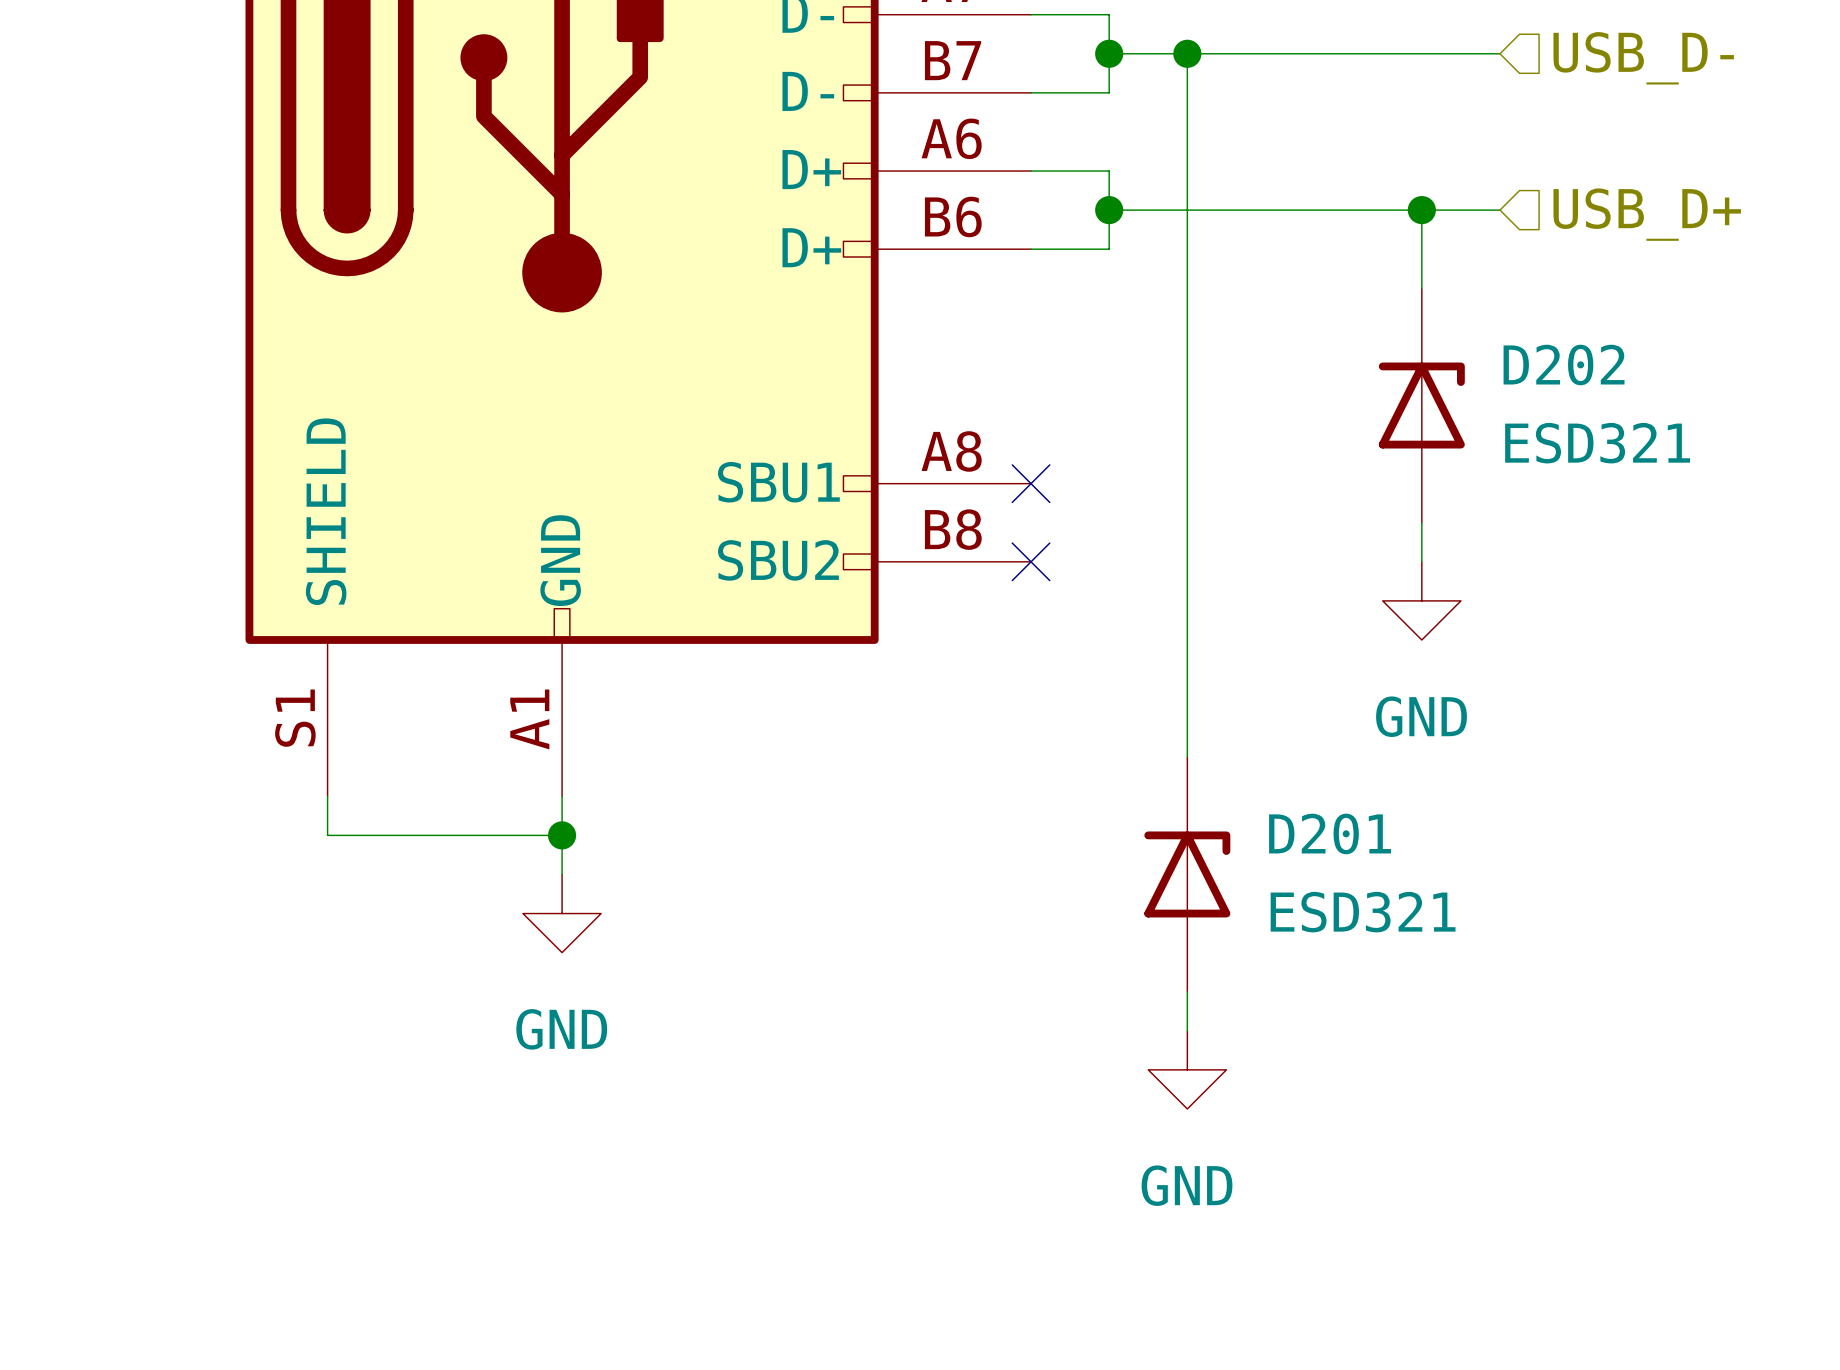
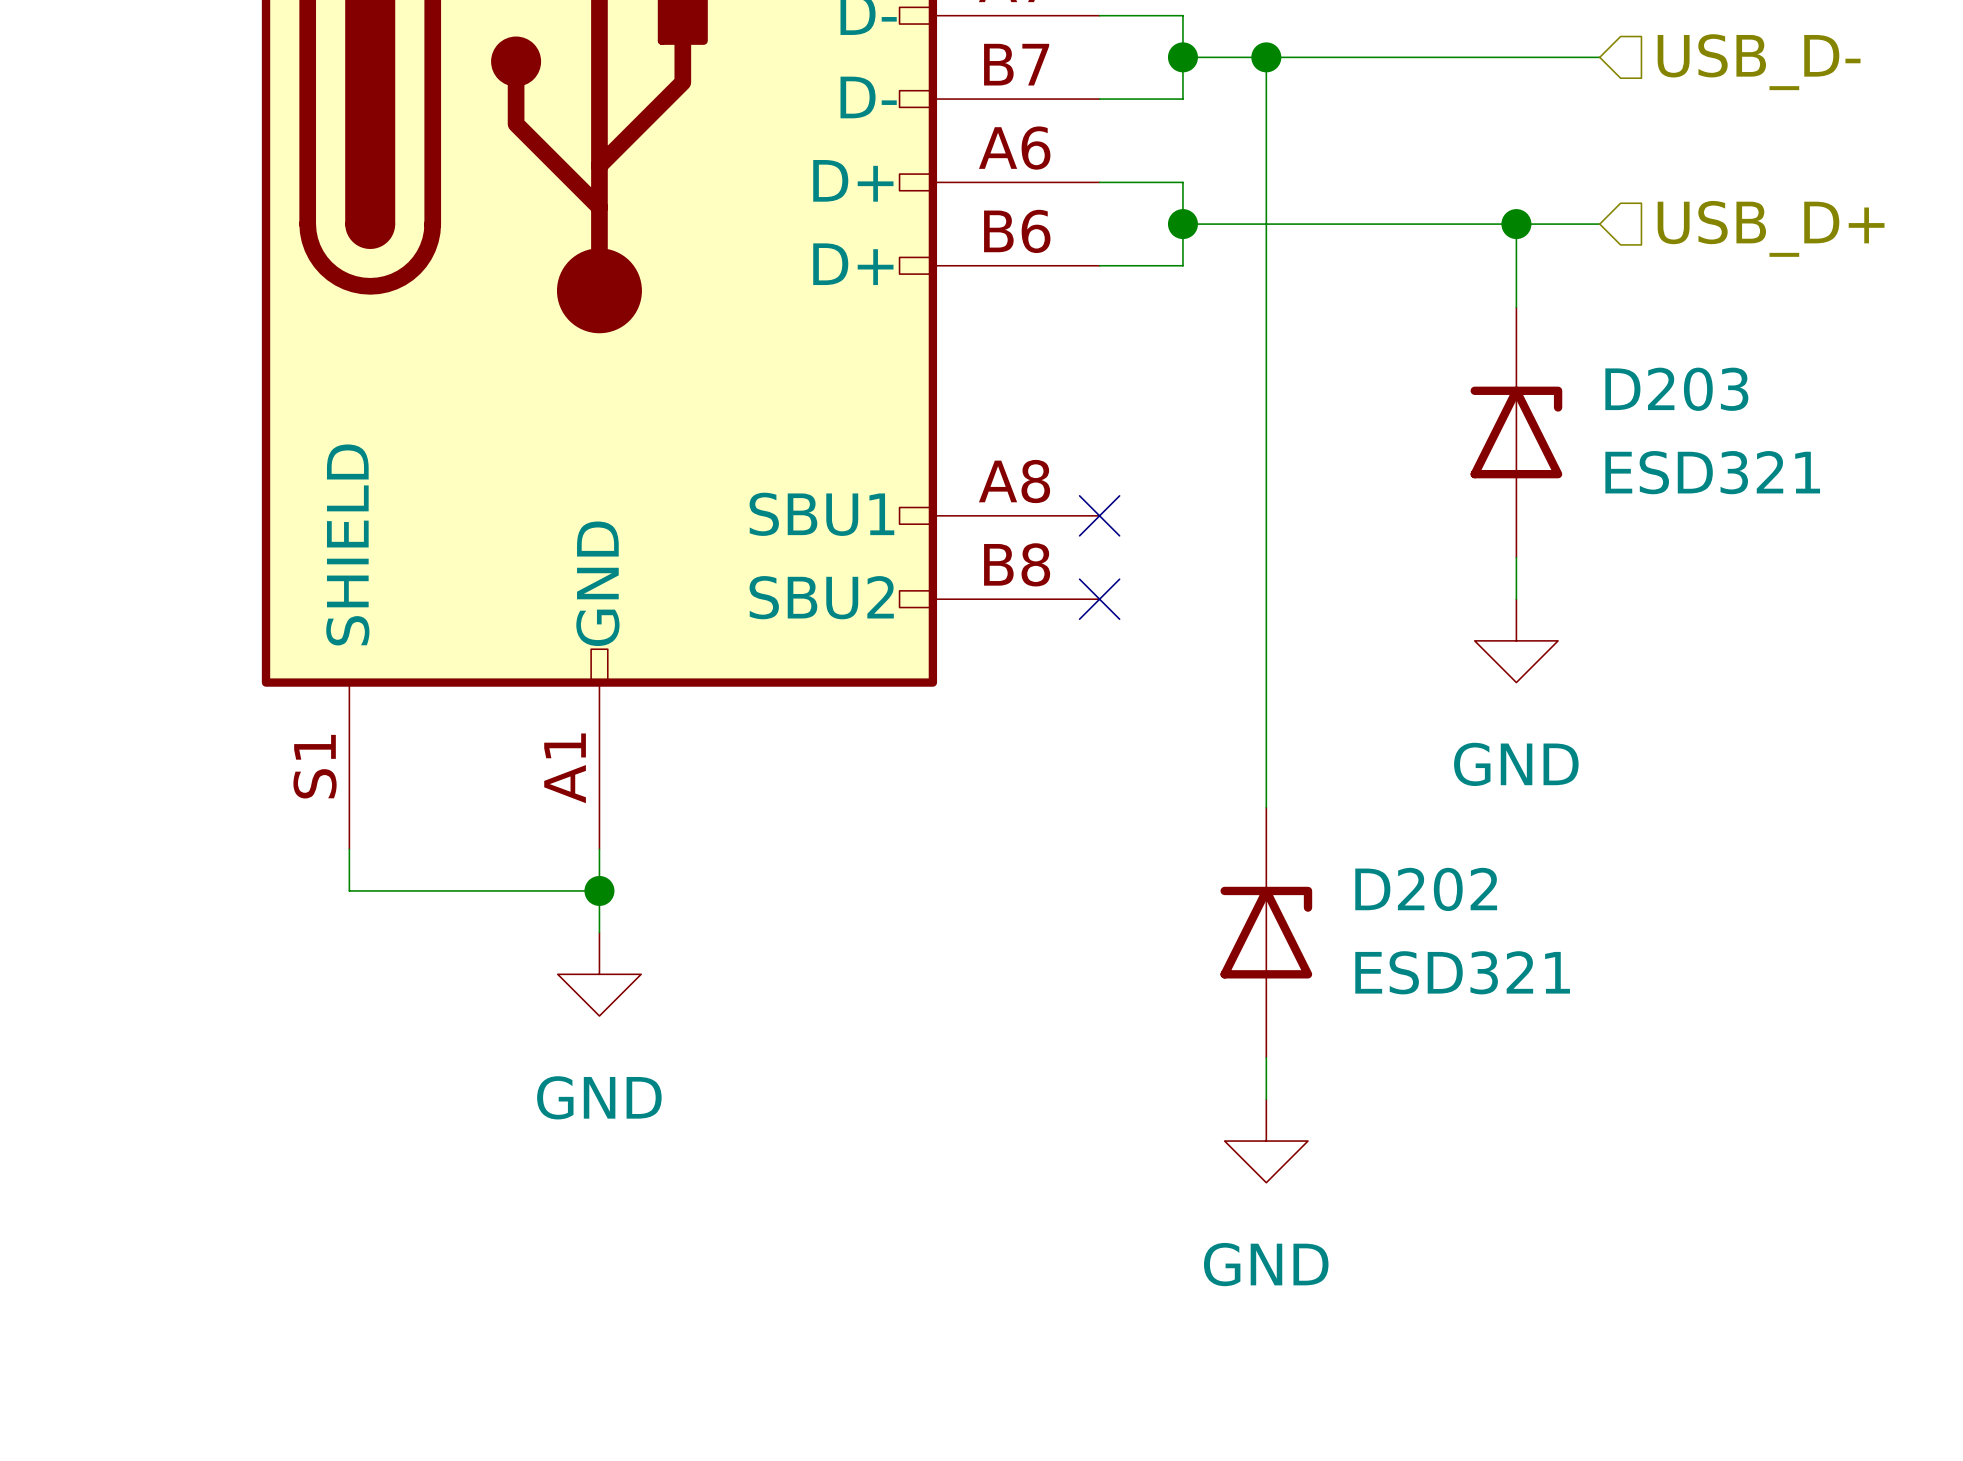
D202 name: D202 (1564, 364) -> D203 (1676, 389)
D201 name: D201 (1330, 833) -> D202 (1426, 889)

